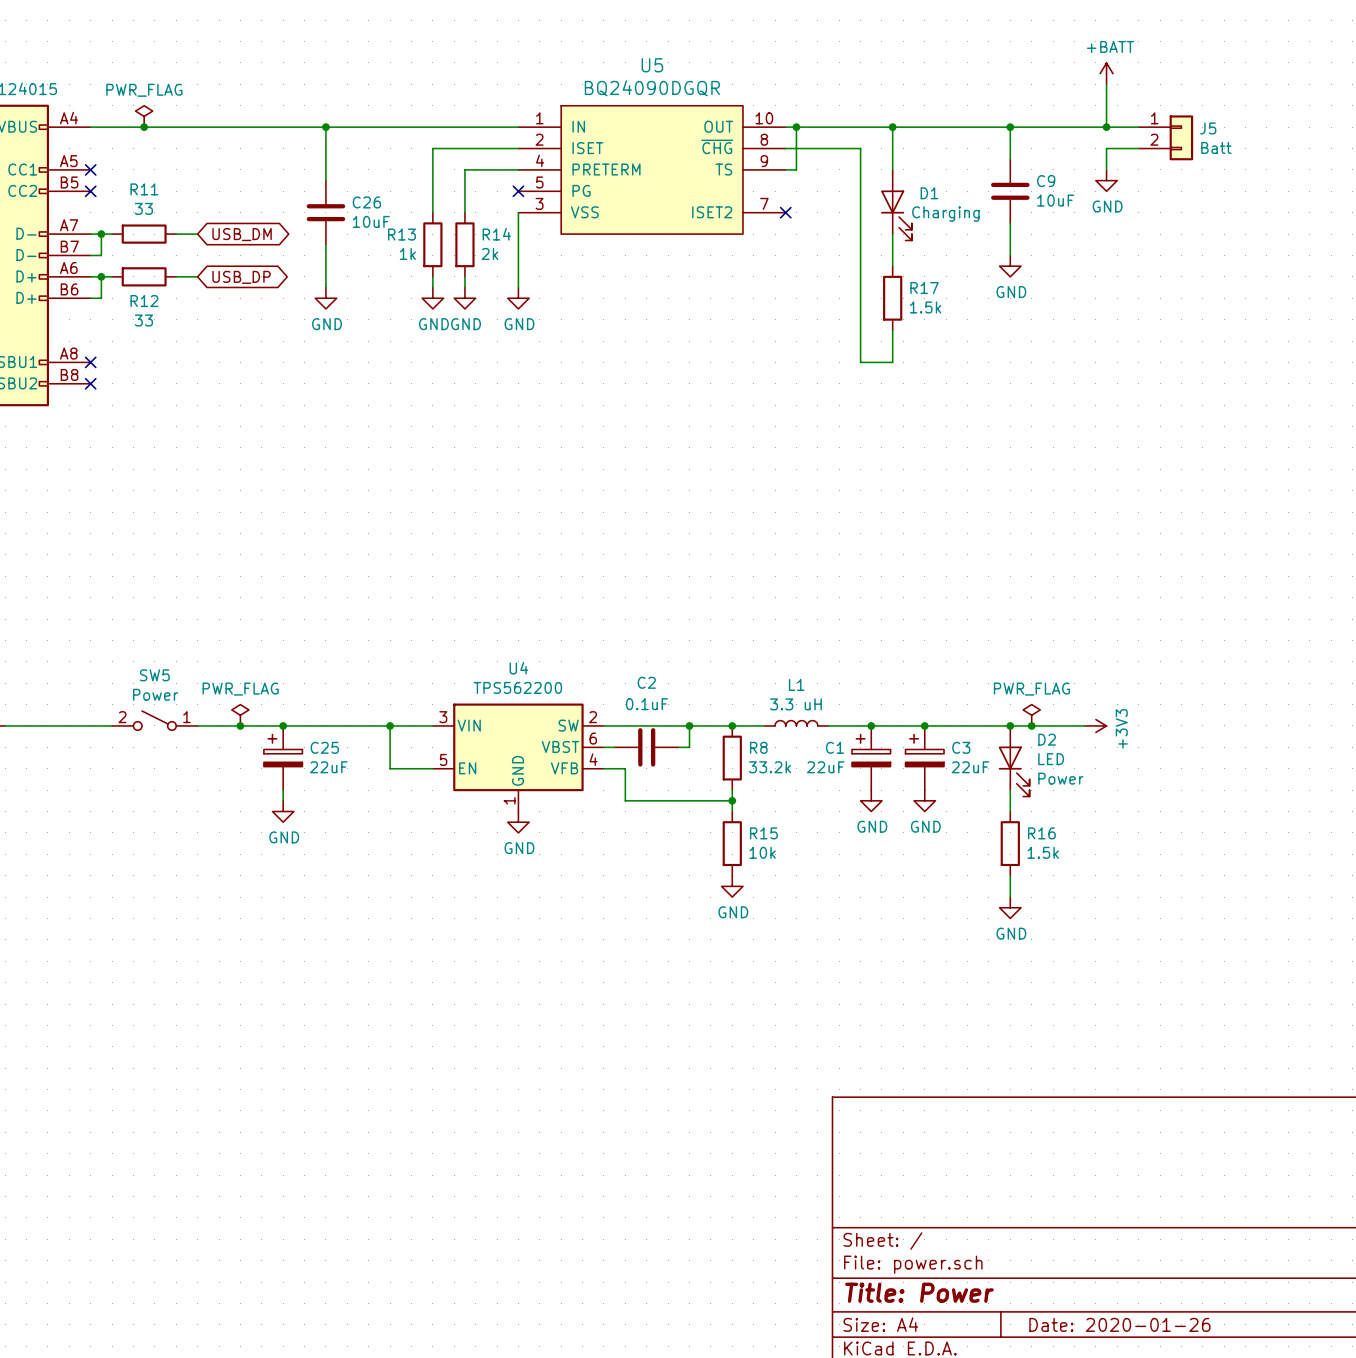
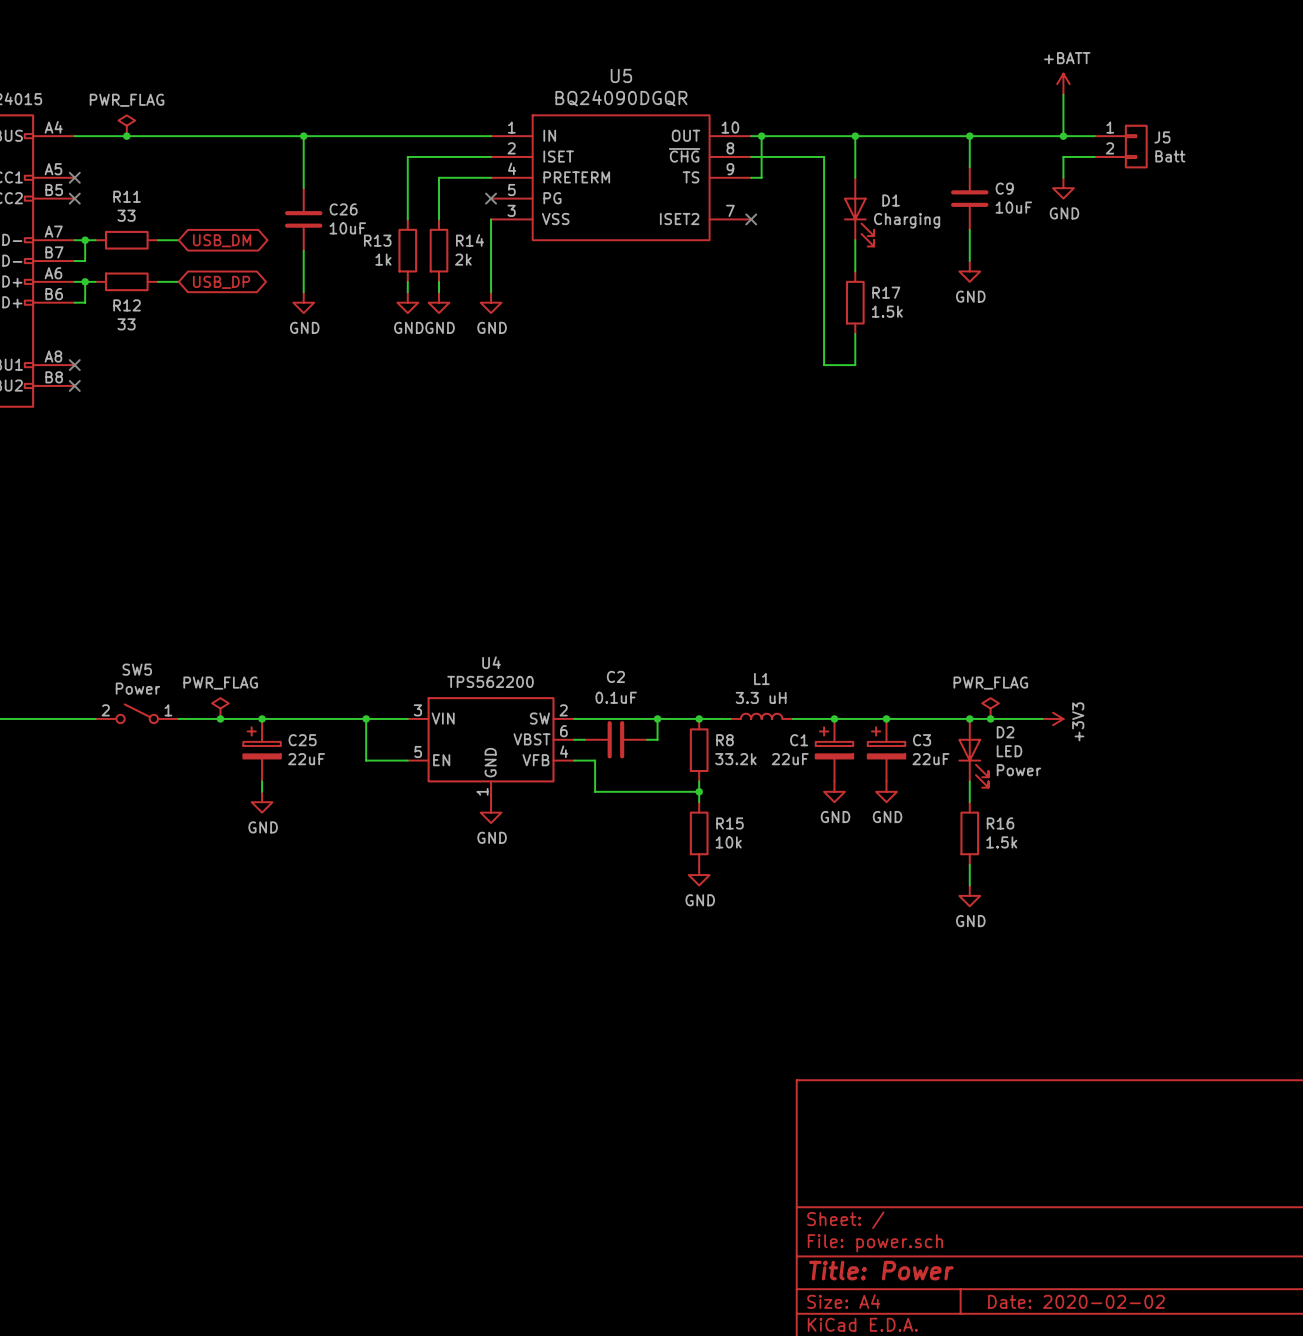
title block: Date: 2020-01-26 (1119, 1324) -> Date: 2020-02-02 (1076, 1301)

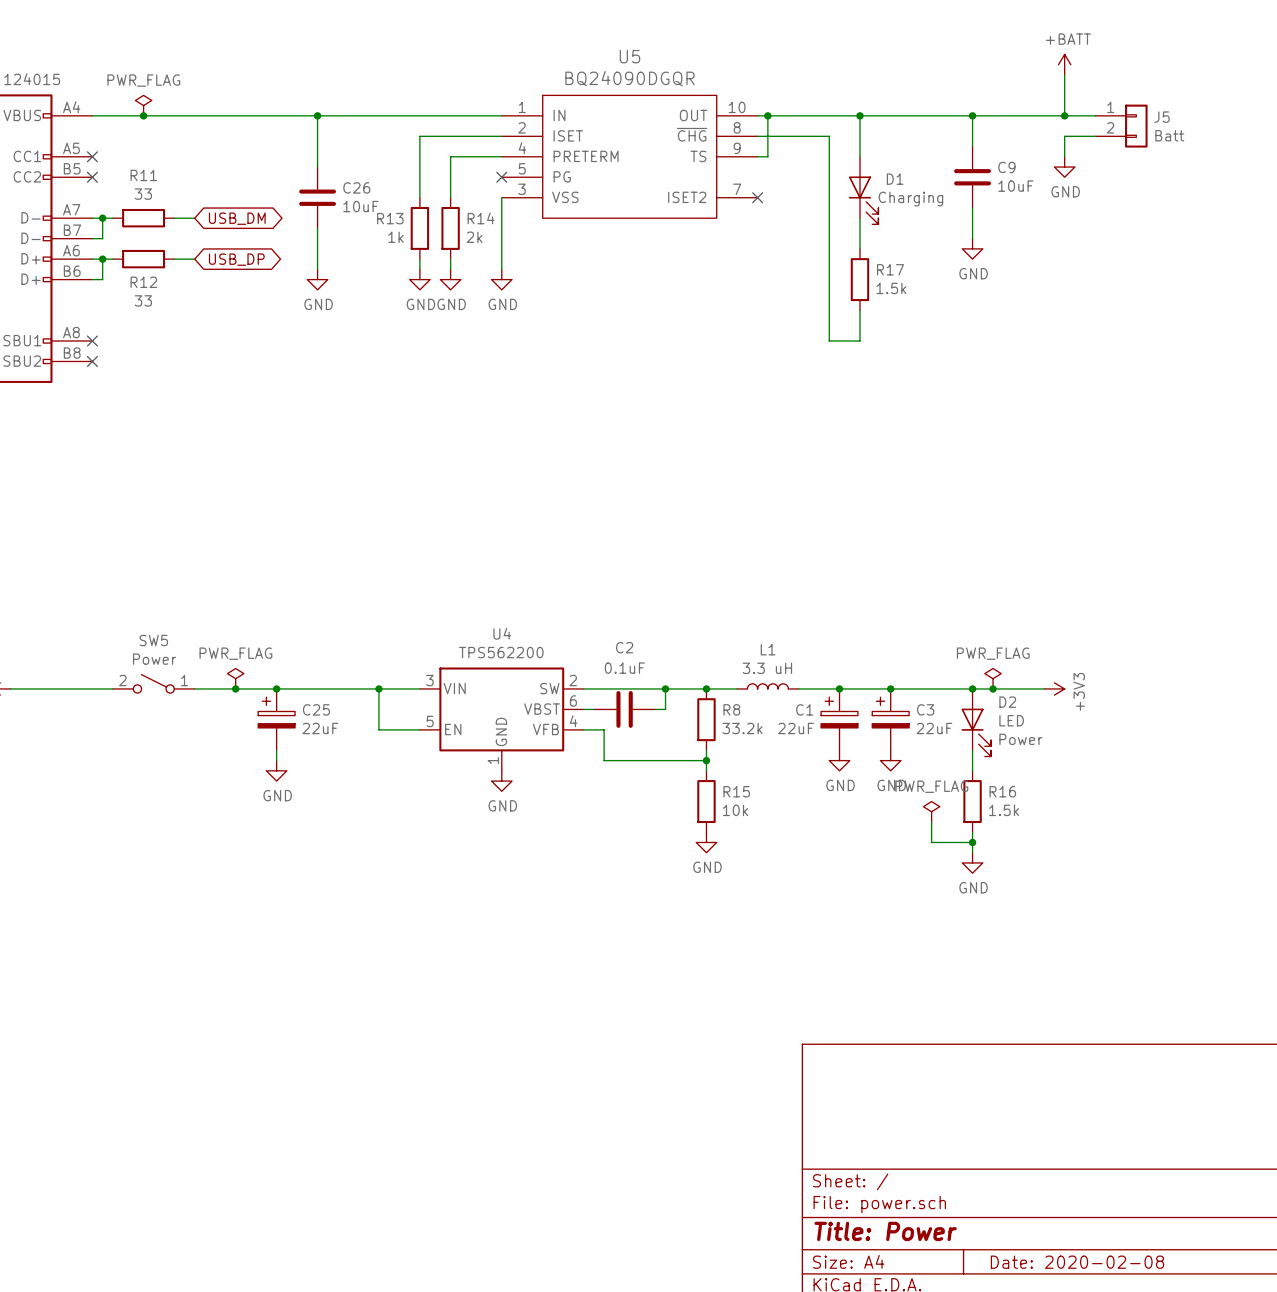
power symbol: none -> PWR_FLAG (931, 811)
wire: none -> (931, 822) (931, 842) (972, 842)
junction: none -> (972, 842)
title block: Date: 2020-02-02 (1076, 1301) -> Date: 2020-02-08 (1077, 1262)

